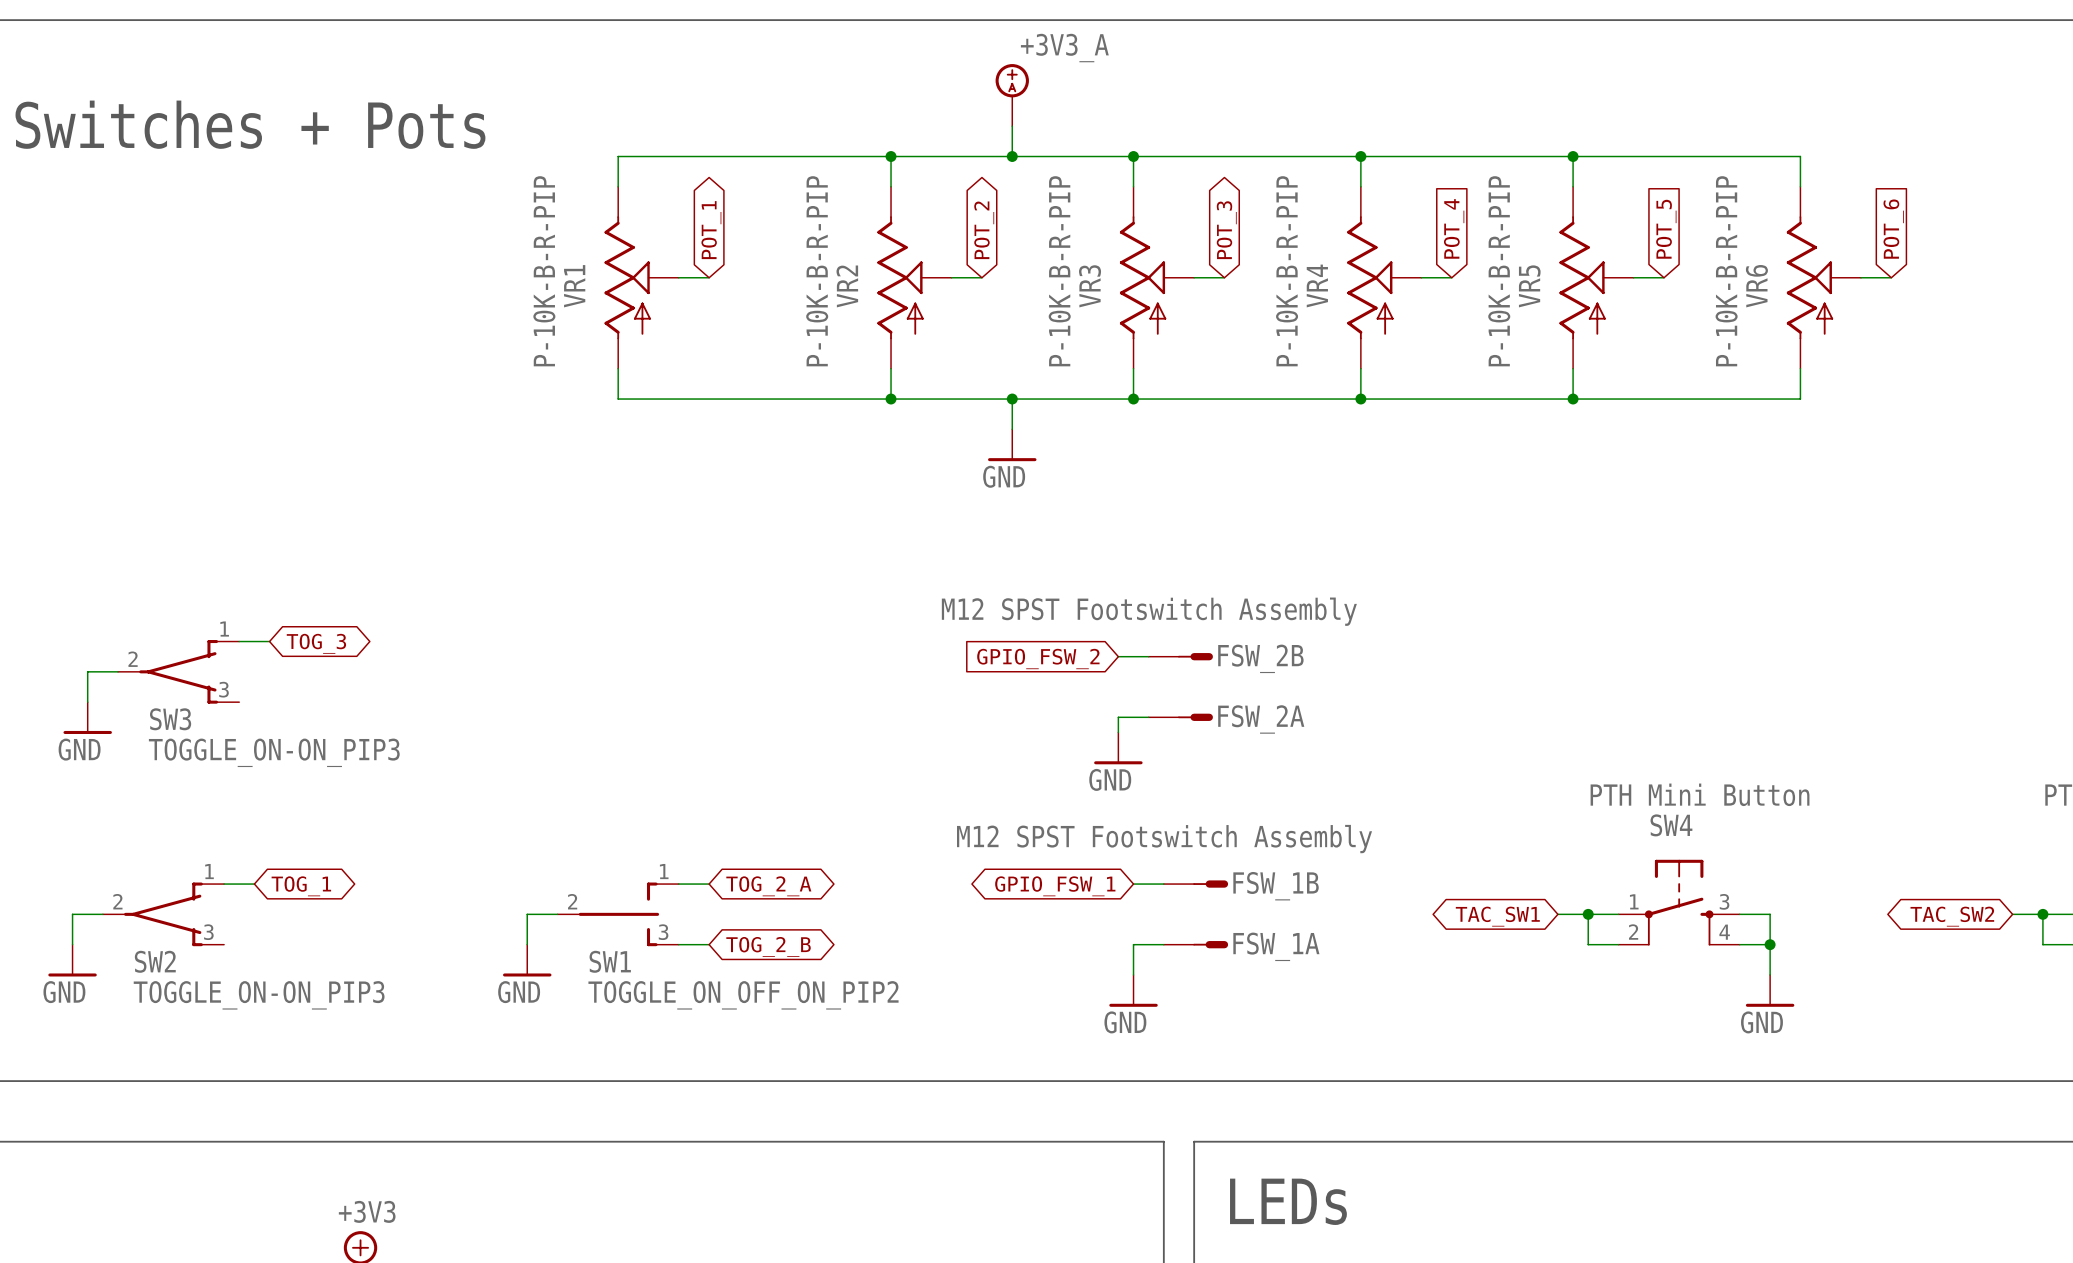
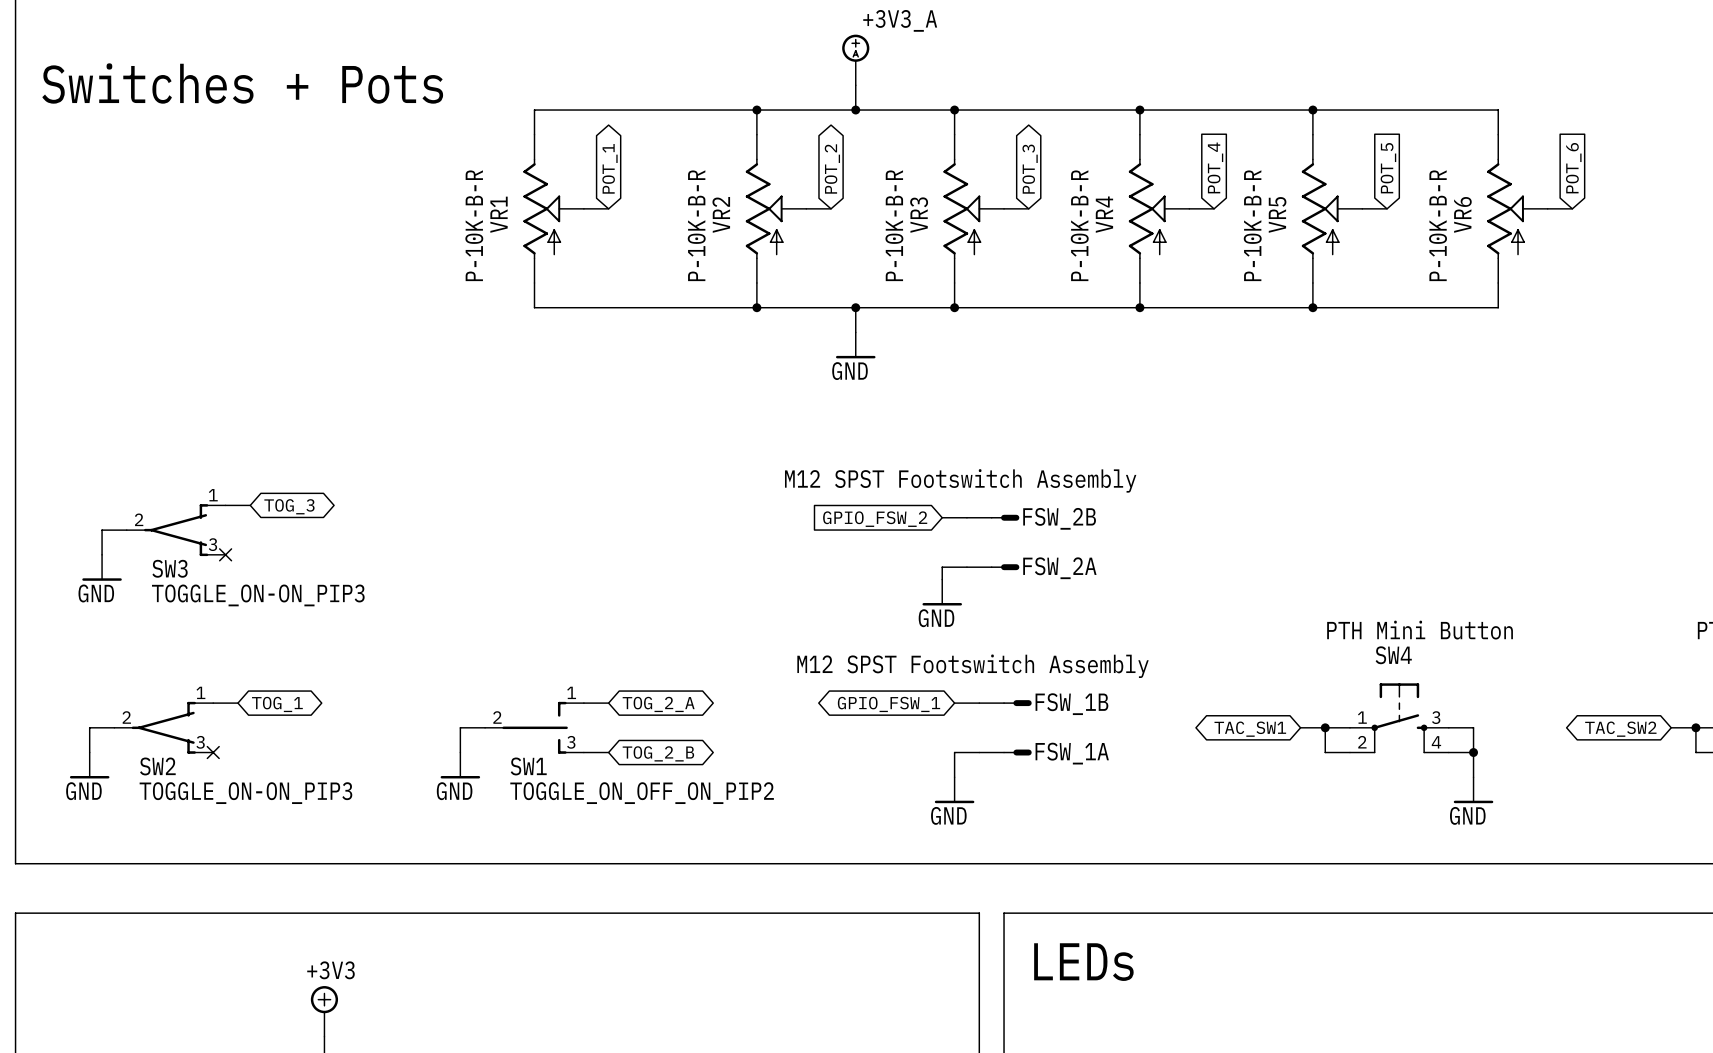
VR1 value: P-10K-B-R-PIP (544, 271) -> P-10K-B-R (474, 225)
VR2 value: P-10K-B-R-PIP (817, 271) -> P-10K-B-R (696, 225)
VR3 value: P-10K-B-R-PIP (1059, 271) -> P-10K-B-R (894, 225)
VR4 value: P-10K-B-R-PIP (1287, 271) -> P-10K-B-R (1079, 225)
VR5 value: P-10K-B-R-PIP (1499, 271) -> P-10K-B-R (1252, 225)
VR6 value: P-10K-B-R-PIP (1726, 271) -> P-10K-B-R (1438, 225)
no-connect mark: none -> (225, 554)
no-connect mark: none -> (213, 752)

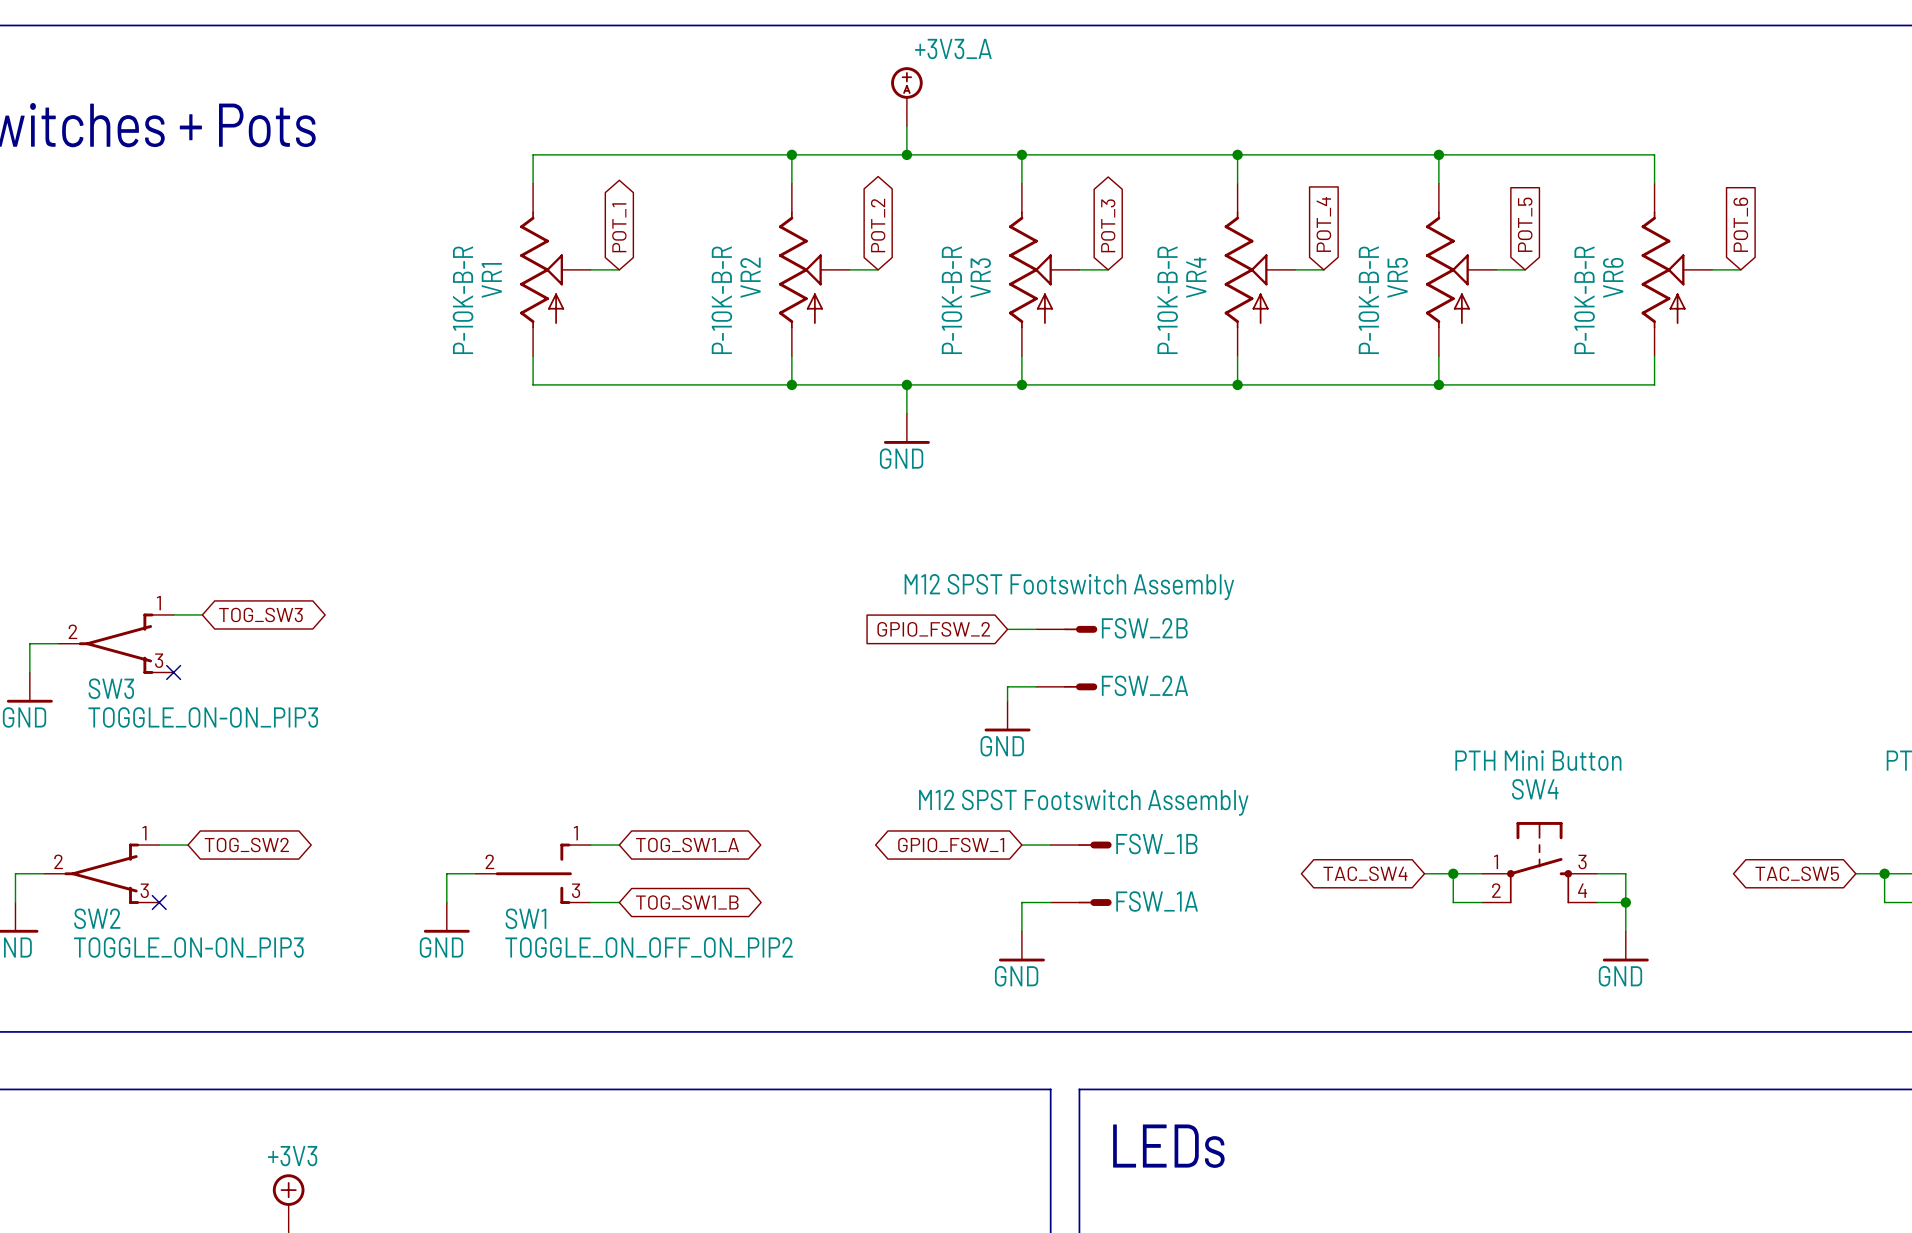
global label: TOG_3 (289, 506) -> TOG_SW3 (260, 614)
global label: TOG_1 (277, 704) -> TOG_SW2 (246, 845)
global label: TOG_2_A (658, 704) -> TOG_SW1_A (687, 845)
global label: TAC_SW1 (1250, 729) -> TAC_SW4 (1365, 873)
global label: TAC_SW2 (1620, 729) -> TAC_SW5 (1797, 873)
global label: TOG_2_B (658, 753) -> TOG_SW1_B (687, 902)

